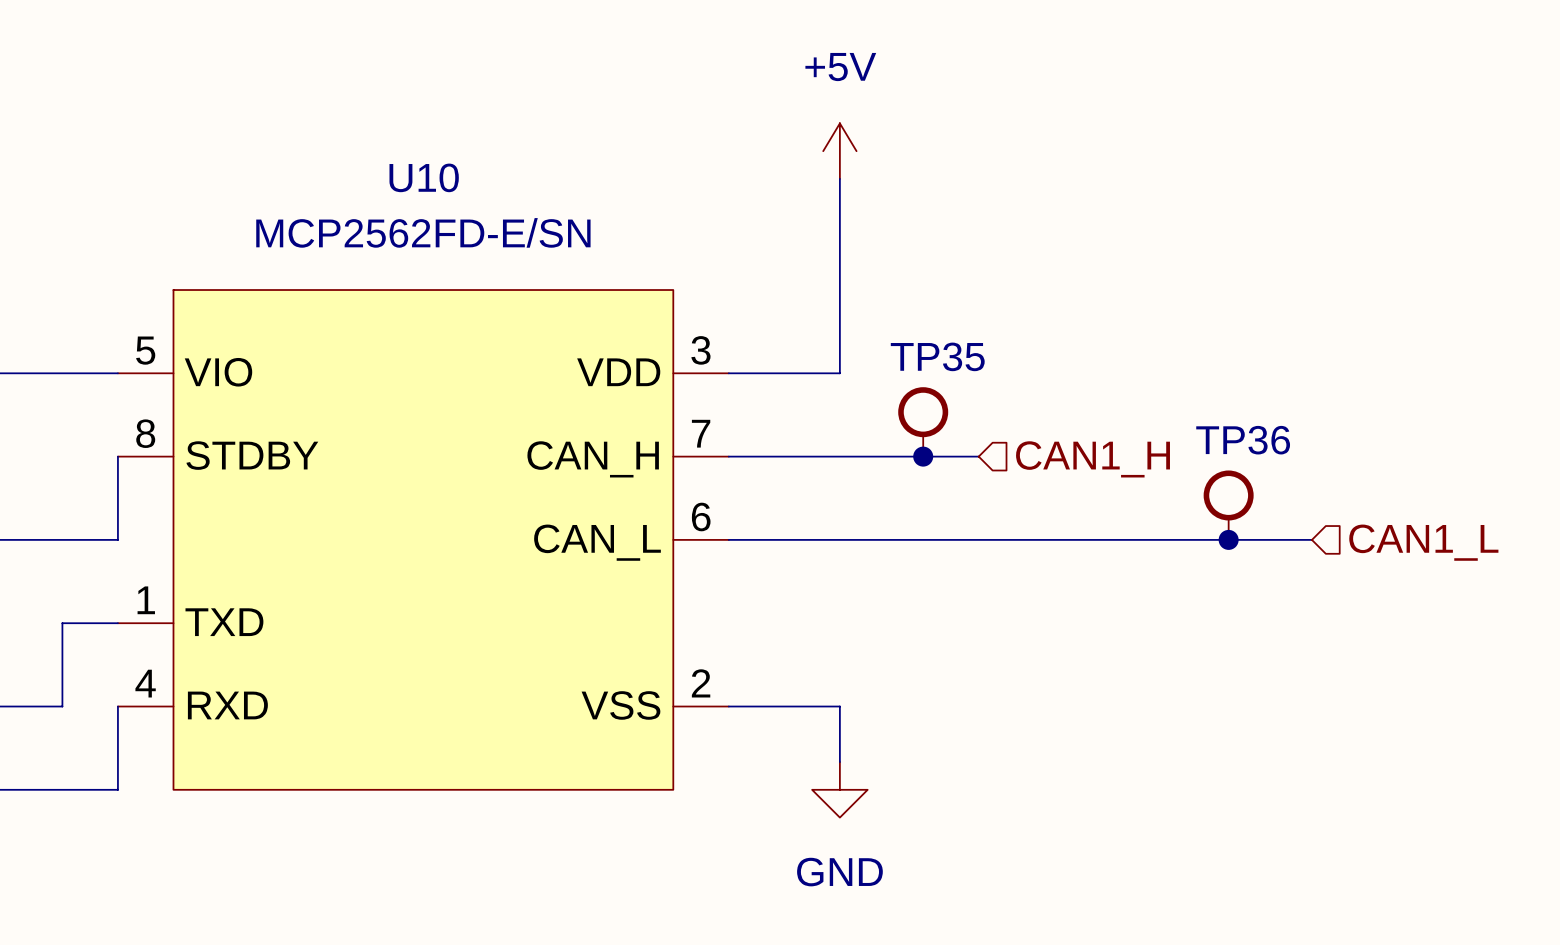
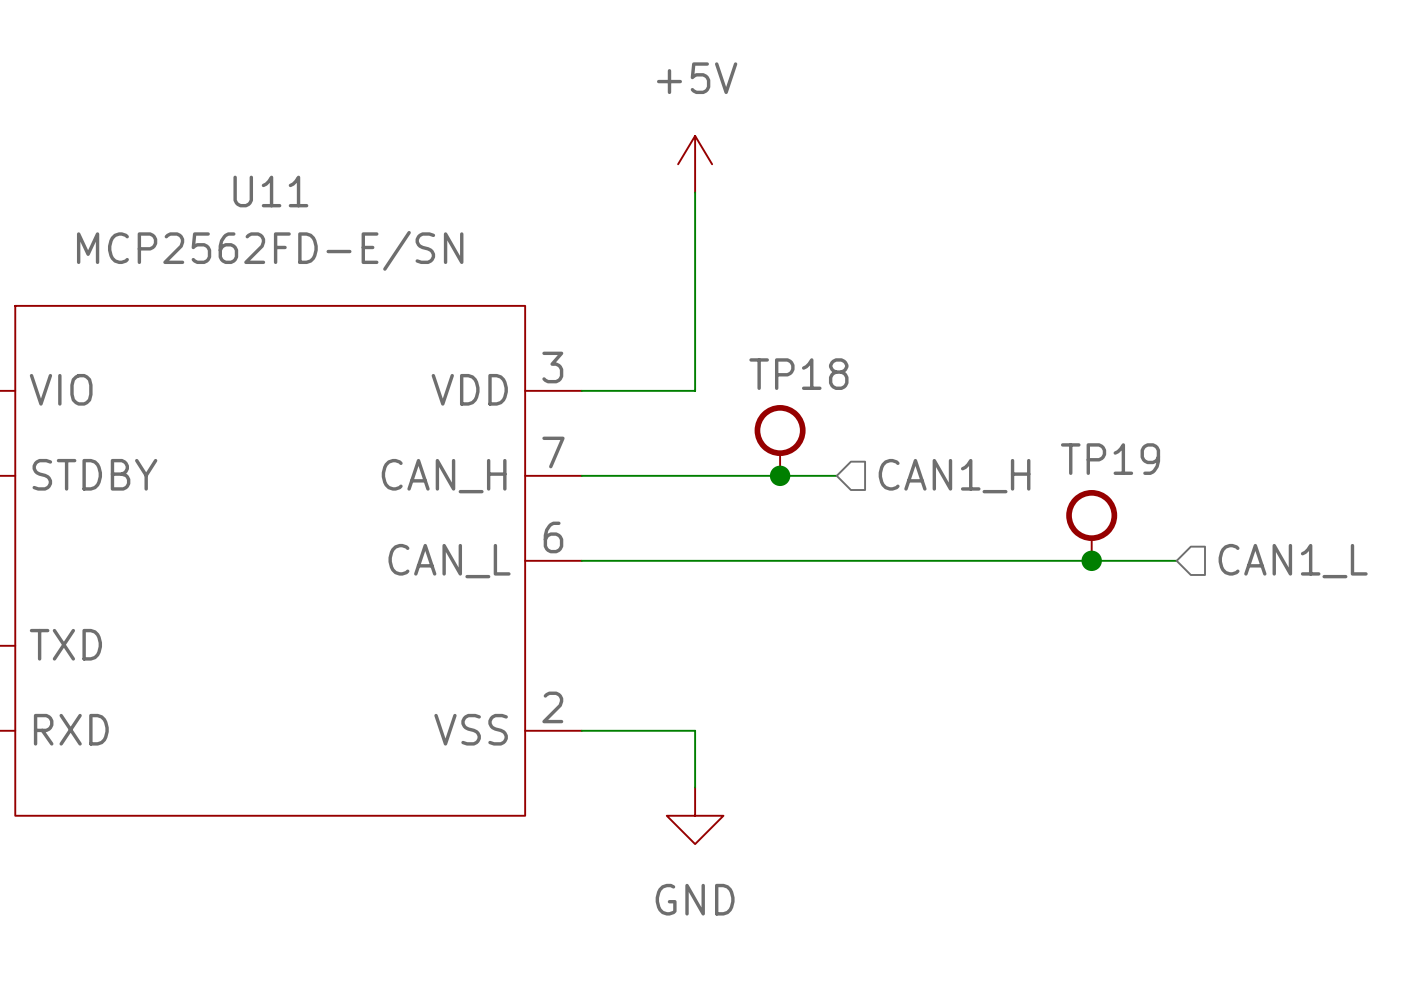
U10 name: U10 (424, 177) -> U11 (270, 191)
TP35 name: TP35 (937, 356) -> TP18 (798, 374)
TP36 name: TP36 (1243, 440) -> TP19 (1110, 459)

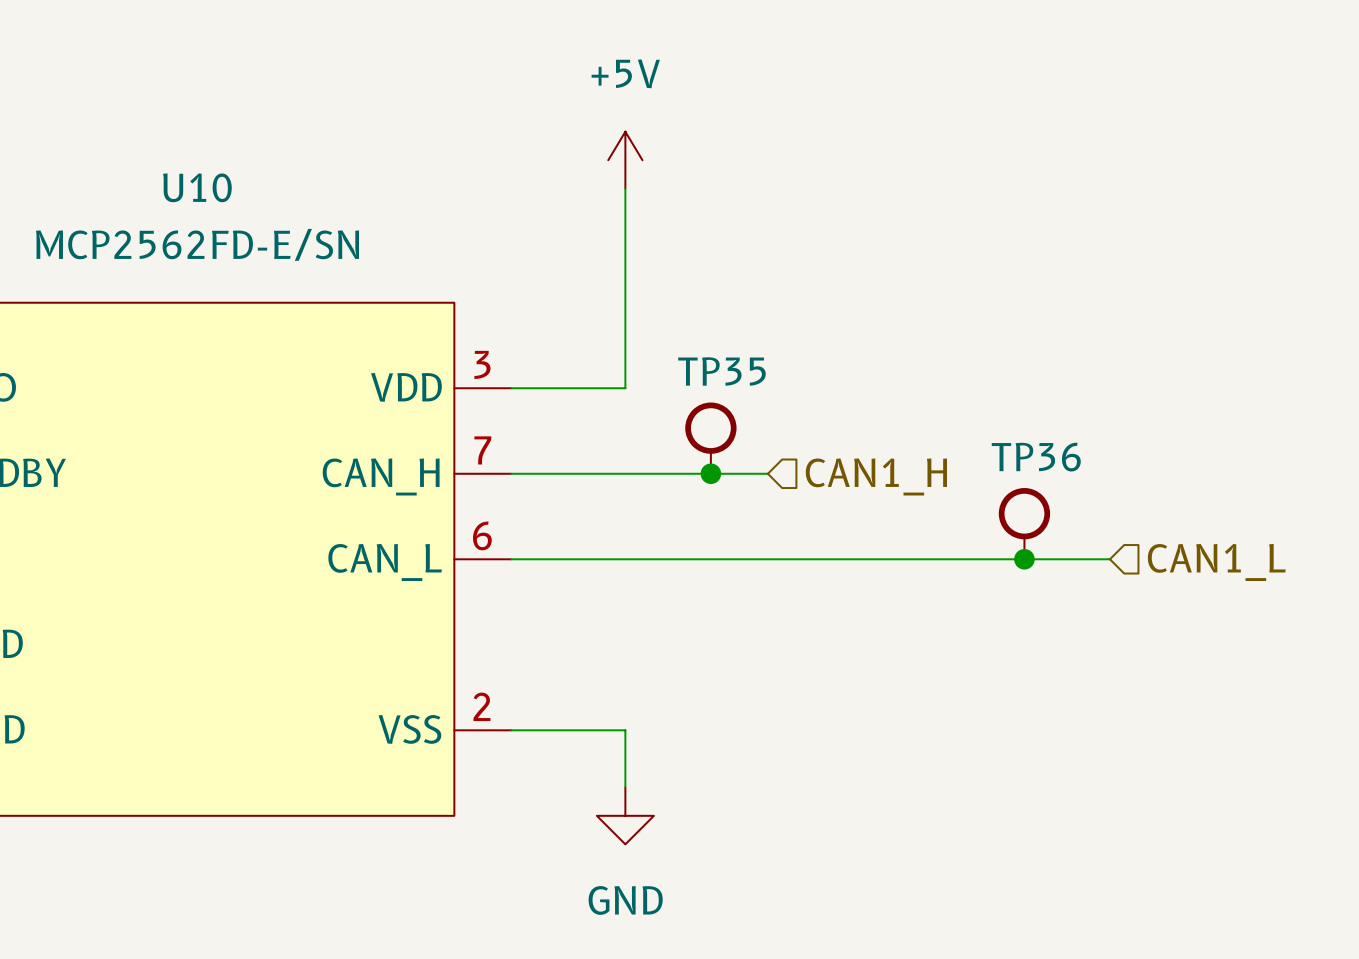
U11 name: U11 (270, 191) -> U10 (197, 187)
TP18 name: TP18 (798, 374) -> TP35 (721, 371)
TP19 name: TP19 (1110, 459) -> TP36 (1036, 457)

